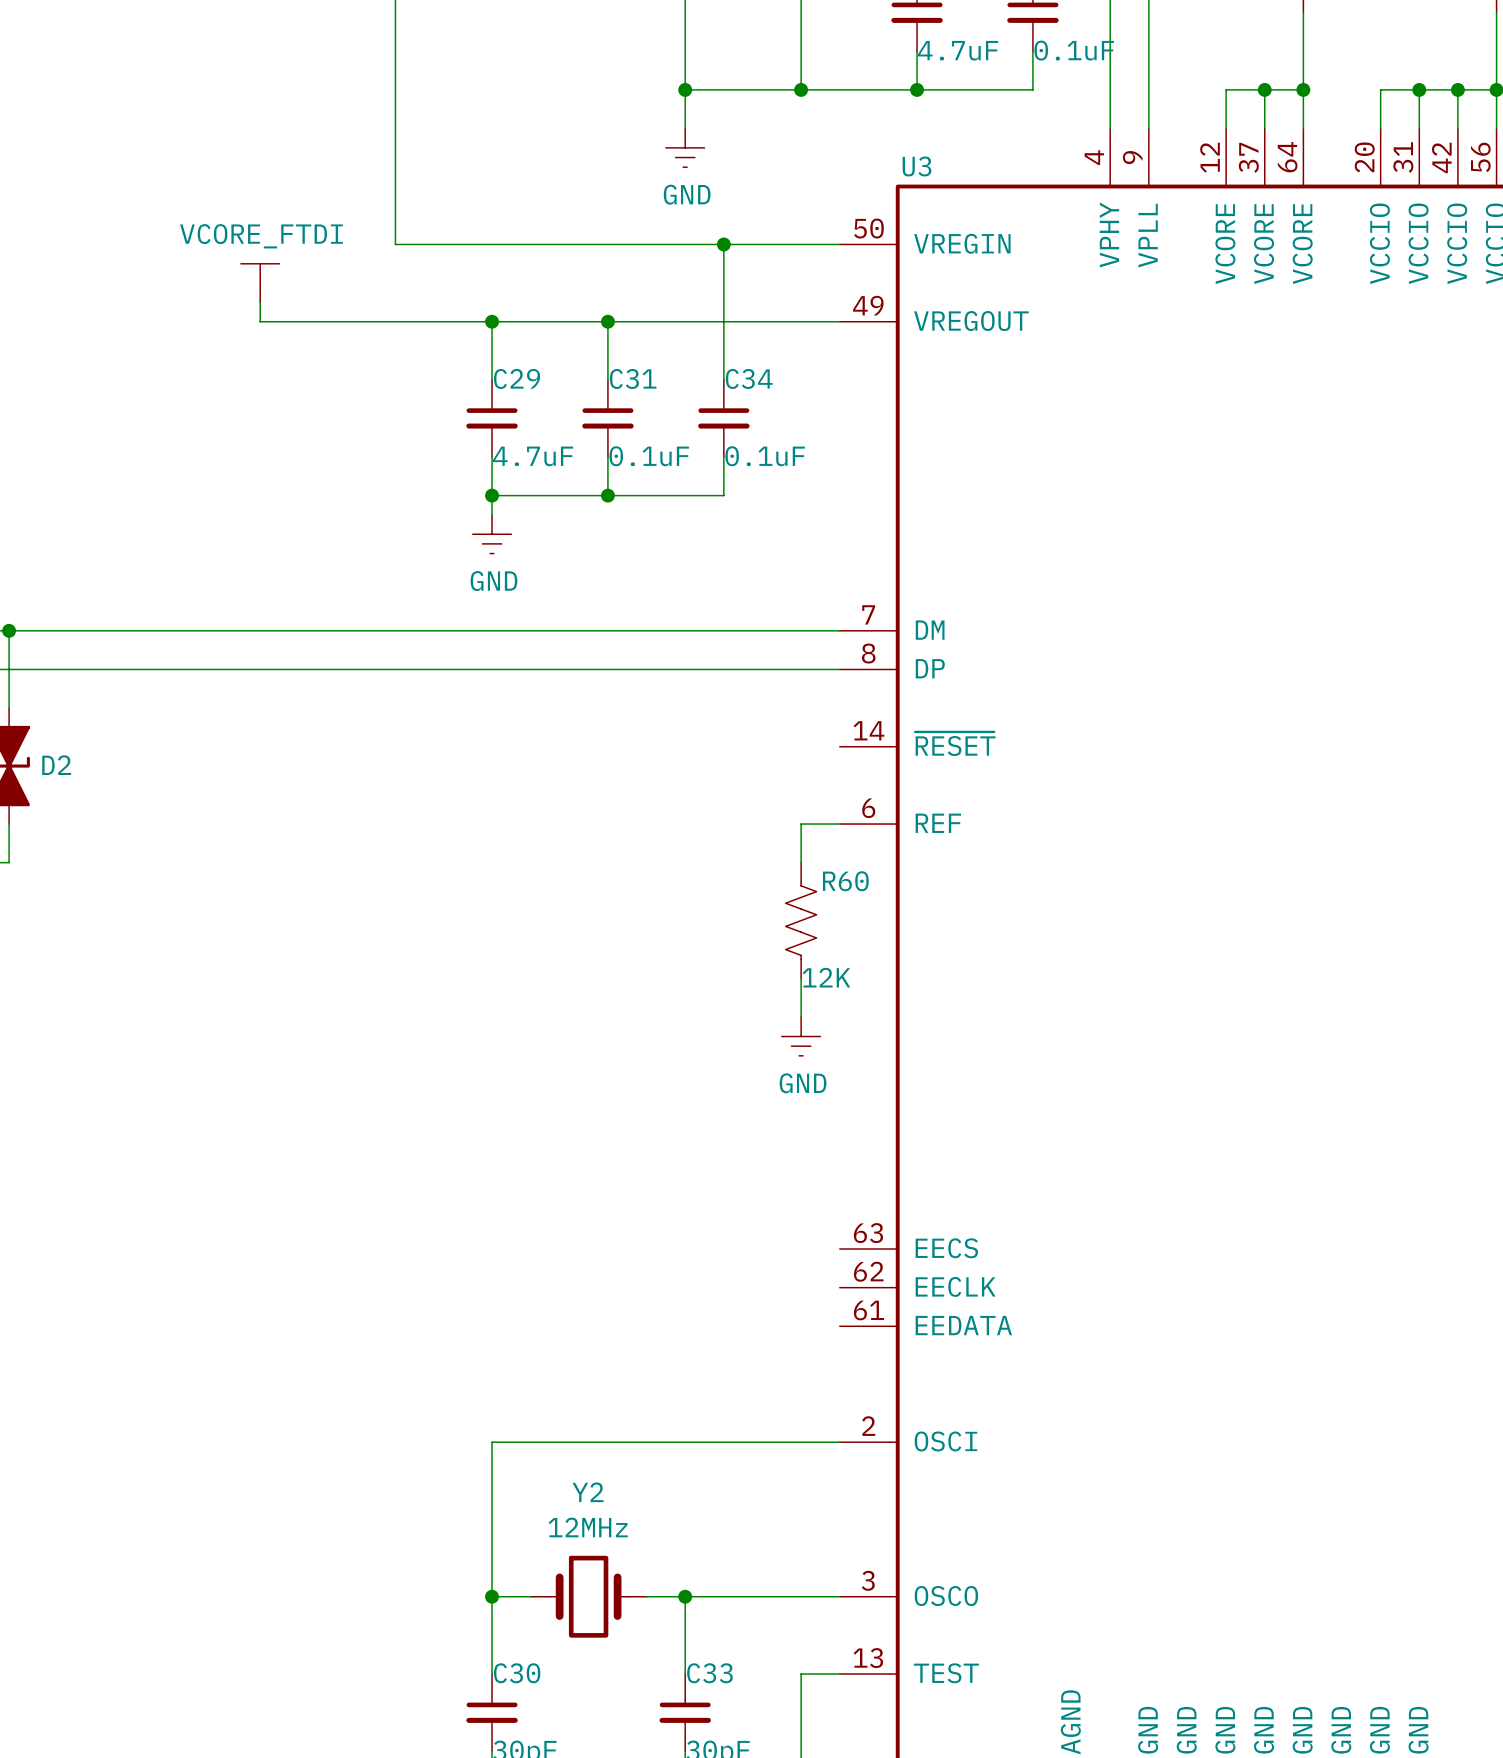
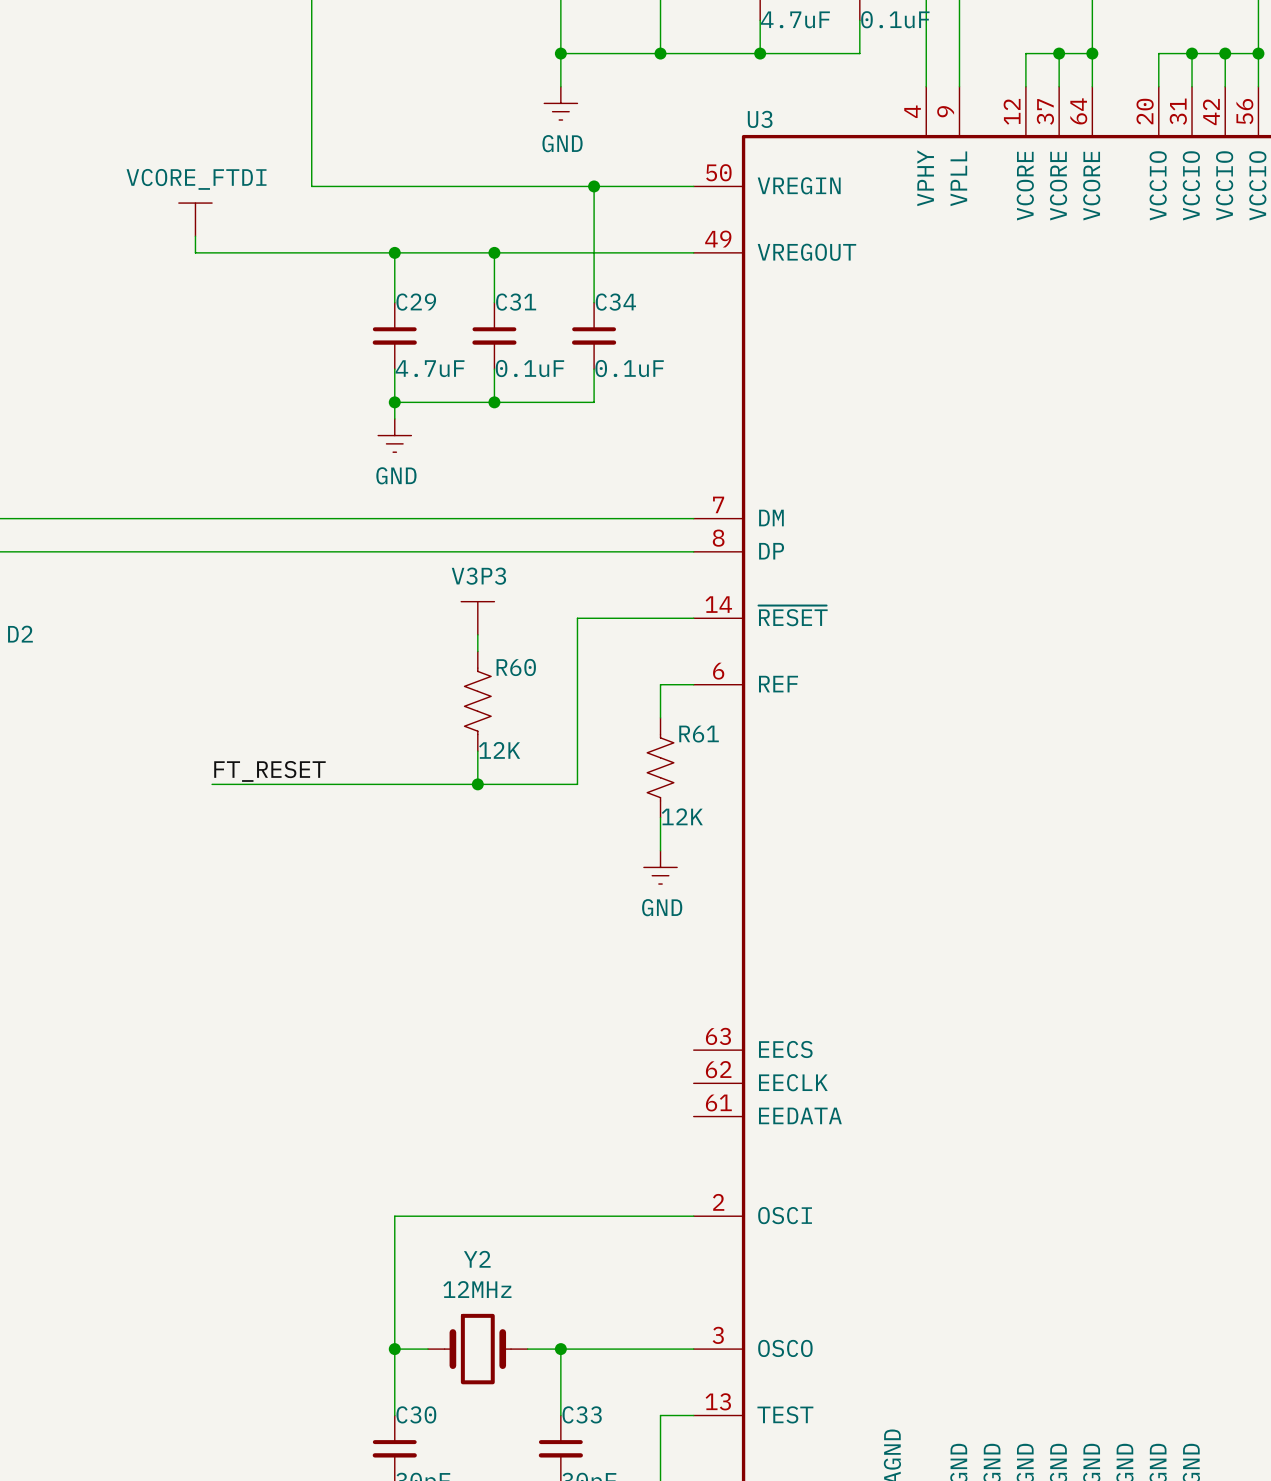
power symbol: none -> V3P3 (477, 618)
wire: none -> (693, 618) (577, 618) (577, 784) (212, 784)
wire: none -> (477, 634) (477, 651)
R60: none -> 12K (477, 701)
R60 name: R60 (845, 881) -> R61 (699, 734)
wire: none -> (477, 751) (477, 784)
label: none -> FT_RESET (269, 771)
junction: none -> (477, 784)

